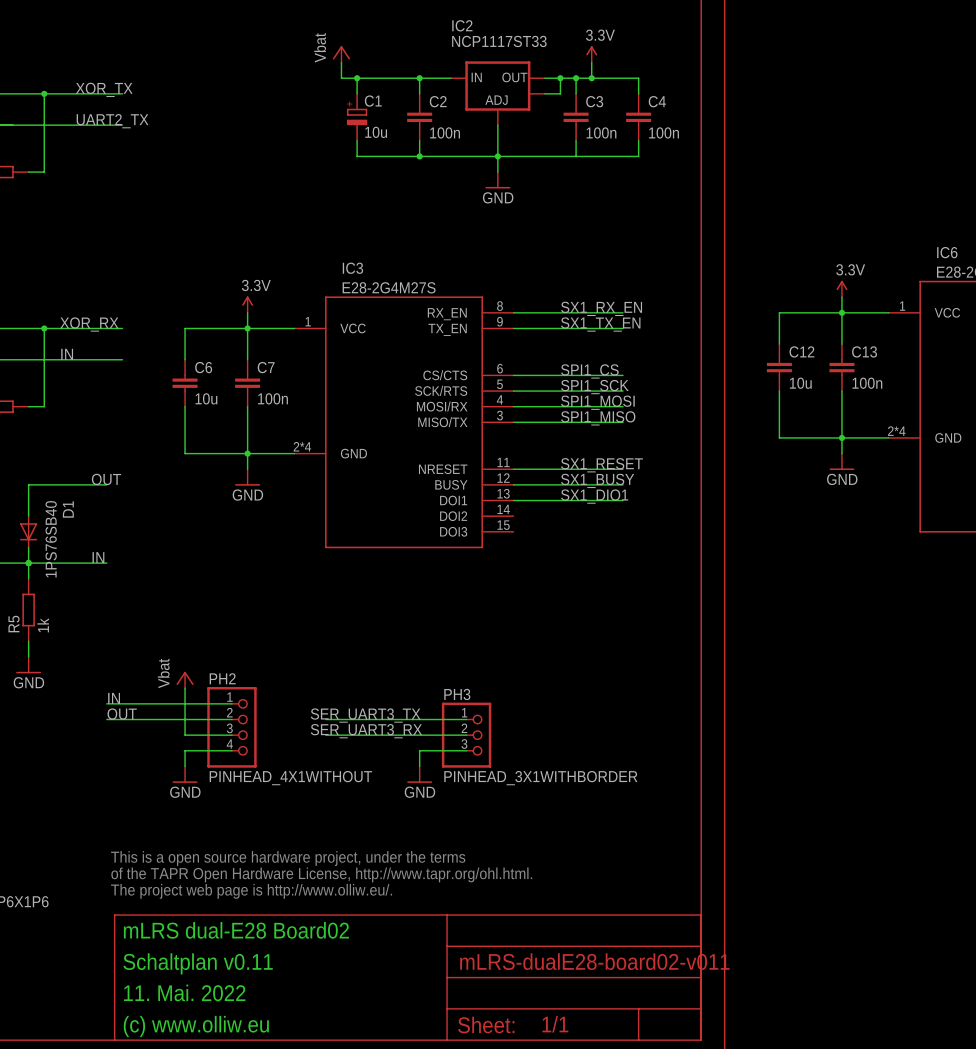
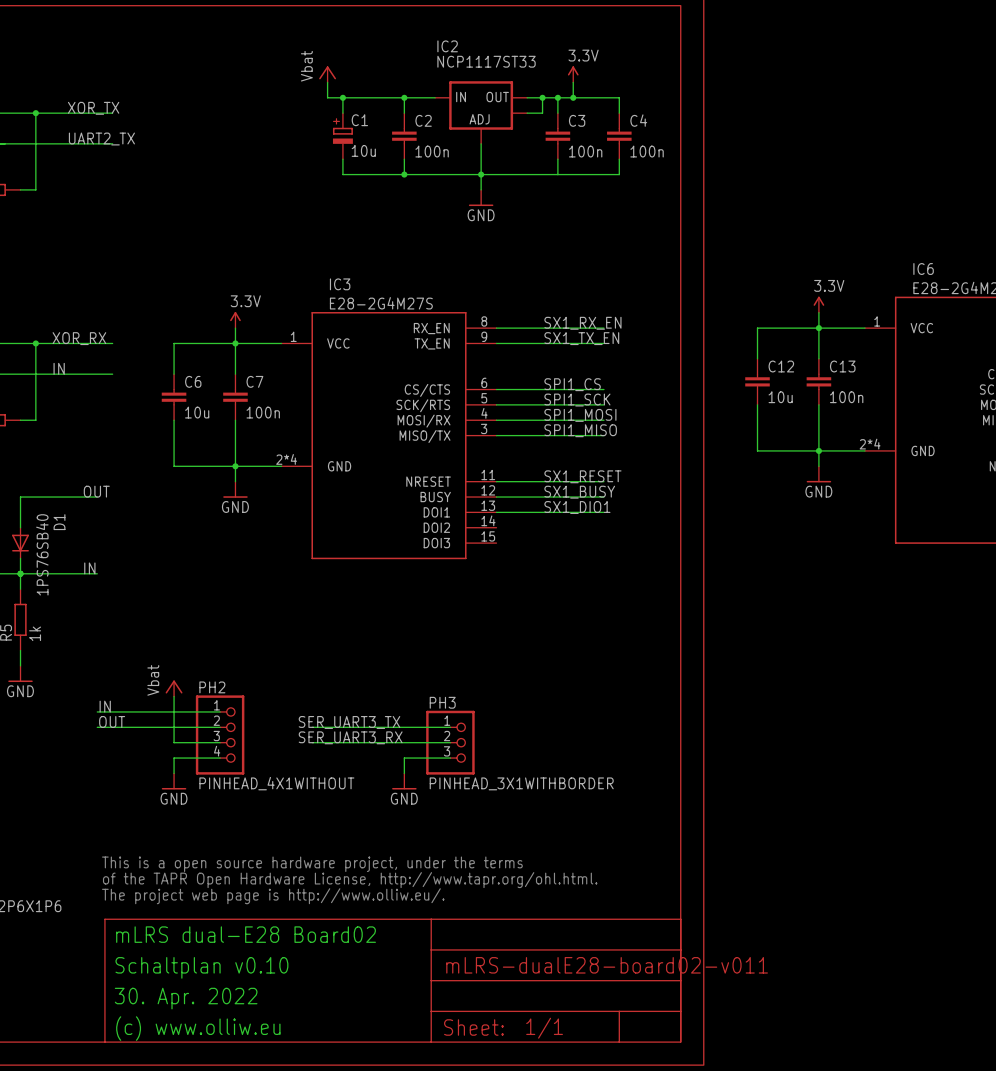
text: Schaltplan v0.11 (198, 963) -> Schaltplan v0.10 (201, 967)
text: 11. Mai. 2022 (184, 992) -> 30. Apr. 2022 (186, 998)

